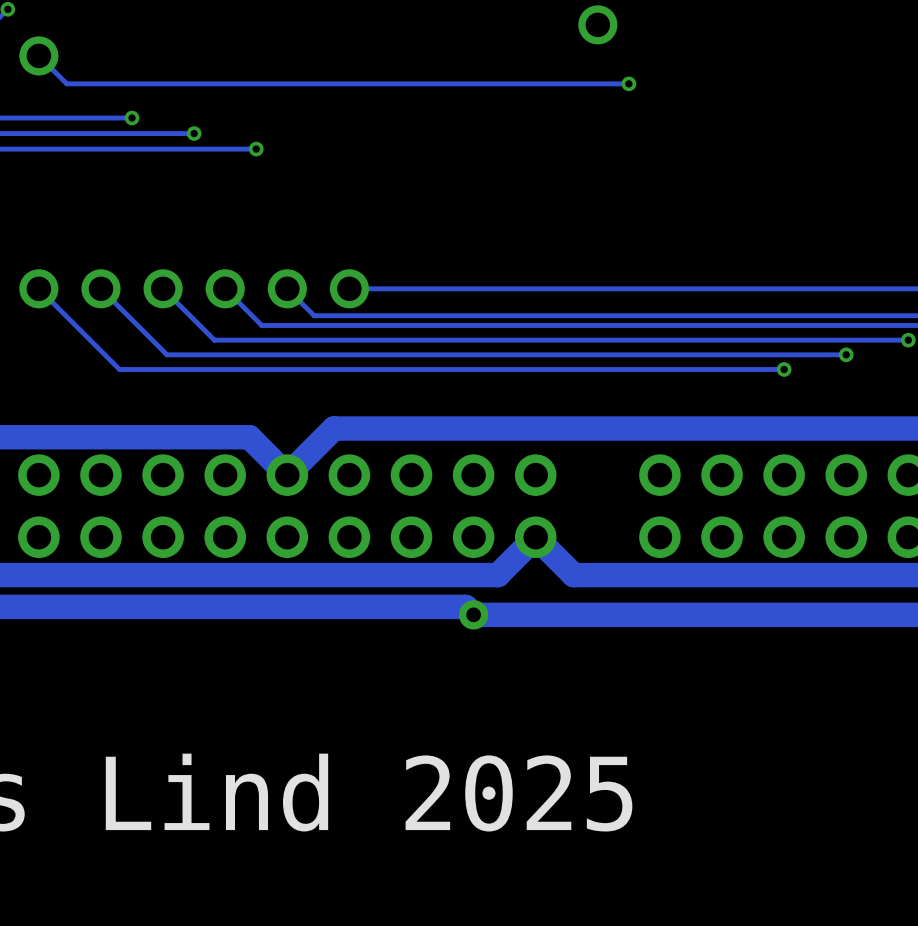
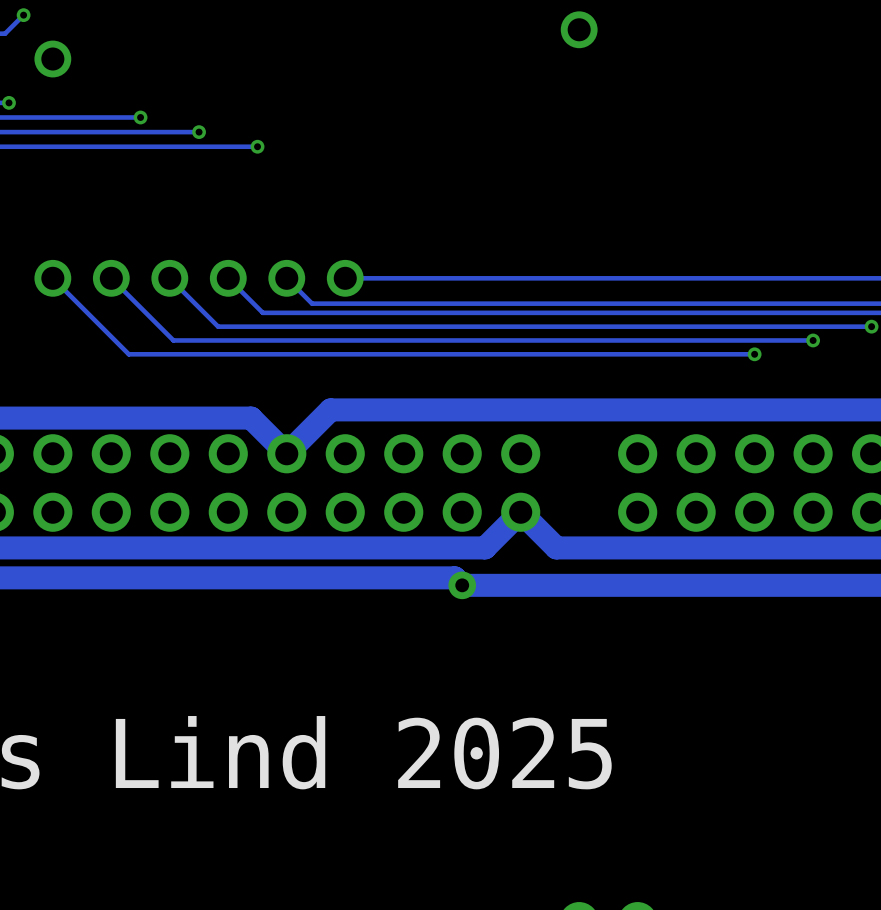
track: (38, 55) (66, 83) (628, 83) -> none
via: (628, 83) -> none

